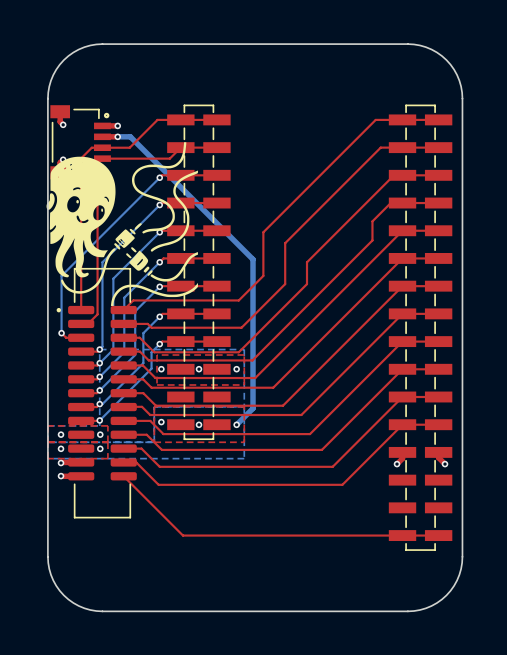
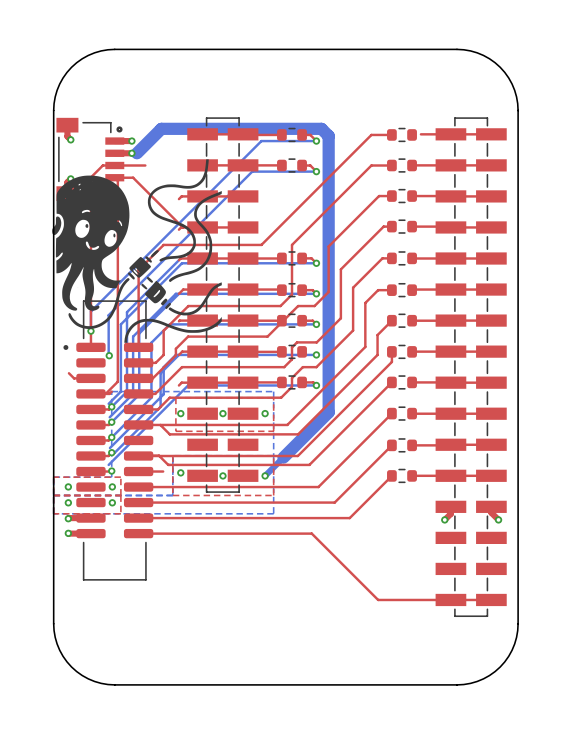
top track: (180, 119) (157, 119) (129, 147) -> none
top track: none -> (243, 134) (281, 134)
top track: (375, 119) (263, 232) (263, 275) -> (391, 196) (379, 196) (328, 246) (328, 291) (314, 306) (298, 306) (295, 309)
part: none -> (292, 134)
top track: none -> (302, 134) (310, 134) (316, 141)
top track: none -> (391, 134) (371, 134) (261, 244) (163, 244) (138, 269) (138, 347)
part: none -> (401, 134)
bottom track: none -> (316, 141) (261, 141) (90, 311) (90, 331)
via: none -> (316, 141)
bottom track: (122, 136) (130, 136) (253, 259) (253, 408) -> (136, 153) (161, 128) (321, 128) (328, 135) (328, 412) (283, 457)
top track: (180, 147) (169, 158) (118, 158) -> (182, 227) (133, 177)
top track: none -> (243, 165) (281, 165)
part: none -> (292, 165)
top track: none -> (302, 165) (310, 165) (316, 171)
top track: none -> (391, 165) (371, 165) (292, 244) (292, 294) (280, 306) (188, 306) (163, 330) (163, 354) (155, 362)
part: none -> (401, 165)
top track: none -> (412, 165) (426, 165)
top track: (380, 147) (285, 243) (285, 284) (241, 327) -> (391, 226) (383, 226) (340, 269) (340, 318) (316, 342) (297, 342) (292, 347) (292, 359) (284, 367) (270, 367)
bottom track: none -> (316, 171) (252, 171) (108, 315) (109, 355)
via: none -> (316, 171)
top track: (102, 158) (97, 163) (97, 314) (88, 323) -> (114, 177) (117, 180) (117, 381) (105, 393)
part: none -> (401, 196)
top track: (397, 175) (393, 175) (307, 262) (307, 284) (238, 352) (154, 352) (139, 337) (136, 337) -> (445, 196) (412, 196)
bottom track: (159, 177) (61, 275) (61, 333) -> none
via: (159, 177) -> none
part: none -> (401, 226)
top track: (402, 203) (390, 203) (372, 221) (372, 240) (252, 360) (148, 360) (138, 351) -> (450, 227) (412, 226)
bottom track: (159, 205) (102, 262) (102, 346) (99, 349) -> none
via: (159, 205) -> none
top track: none -> (243, 258) (281, 258)
part: none -> (292, 258)
top track: none -> (302, 258) (311, 258) (316, 263)
part: none -> (401, 258)
top track: none -> (412, 258) (450, 258)
top track: (402, 230) (255, 378) (155, 378) (141, 365) -> (391, 258) (382, 258) (353, 287) (353, 330) (316, 367) (302, 367) (292, 378) (292, 386) (281, 397) (169, 397) (158, 409)
via: (159, 232) -> none
bottom track: none -> (316, 263) (182, 263) (120, 324) (120, 391) (108, 403)
via: none -> (316, 263)
top track: none -> (243, 289) (281, 290)
top track: (402, 258) (273, 387) (266, 387) -> (391, 320) (377, 335) (377, 354) (298, 434)
top track: none -> (450, 289) (412, 290)
part: none -> (292, 290)
top track: none -> (302, 290) (312, 290) (316, 293)
top track: none -> (391, 290) (378, 290) (365, 302) (365, 346) (287, 424) (160, 424)
part: none -> (401, 290)
via: (159, 262) -> none
bottom track: none -> (316, 293) (175, 293) (133, 336) (133, 393) (109, 417)
via: none -> (316, 293)
bottom track: (159, 286) (135, 311) -> (316, 324) (169, 324) (151, 342) (151, 348)
via: (159, 286) -> none
top track: none -> (247, 320) (281, 320)
part: none -> (292, 320)
top track: none -> (302, 320) (312, 320) (316, 324)
part: none -> (401, 320)
top track: (402, 286) (282, 405) (155, 405) (143, 393) (135, 393) -> (450, 320) (412, 320)
via: none -> (316, 324)
via: none -> (90, 331)
top track: (167, 300) (133, 300) (123, 310) -> (188, 336) (175, 348) (175, 355) (152, 378)
top track: none -> (243, 351) (281, 351)
top track: (402, 313) (301, 415) (276, 415) -> (391, 382) (309, 464)
top track: none -> (450, 351) (412, 351)
part: none -> (292, 351)
top track: none -> (391, 351) (391, 361) (297, 456) (138, 456)
part: none -> (401, 351)
via: (159, 316) -> none
bottom track: none -> (316, 354) (175, 354) (163, 367) (163, 394) (109, 448)
via: none -> (316, 354)
via: none -> (109, 355)
top track: (139, 323) (147, 323) (151, 327) (162, 327) -> (155, 393) (182, 367)
via: (61, 333) -> none
top track: none -> (281, 382) (243, 382)
part: none -> (292, 382)
top track: none -> (302, 382) (313, 382) (316, 385)
part: none -> (401, 382)
top track: (402, 341) (310, 434) (163, 434) (150, 420) (145, 420) -> (450, 382) (412, 382)
bottom track: (159, 344) (151, 352) (151, 368) (99, 420) -> none
via: (159, 344) -> none
bottom track: none -> (316, 385) (188, 385) (108, 464)
via: none -> (316, 385)
via: (99, 349) -> none
part: none -> (401, 413)
top track: none -> (412, 413) (450, 413)
top track: (402, 369) (321, 449) (161, 449) (146, 434) -> (391, 413) (318, 487) (164, 487)
part: none -> (401, 445)
top track: none -> (412, 445) (450, 445)
top track: (401, 397) (332, 466) (159, 466) (141, 448) -> (391, 445) (334, 502) (158, 502)
part: none -> (401, 475)
top track: none -> (412, 475) (450, 475)
top track: (402, 424) (342, 484) (158, 484) (136, 462) -> (391, 475) (349, 518) (152, 518)
top track: (123, 476) (182, 535) (337, 535) -> (138, 533) (311, 533) (378, 599)

